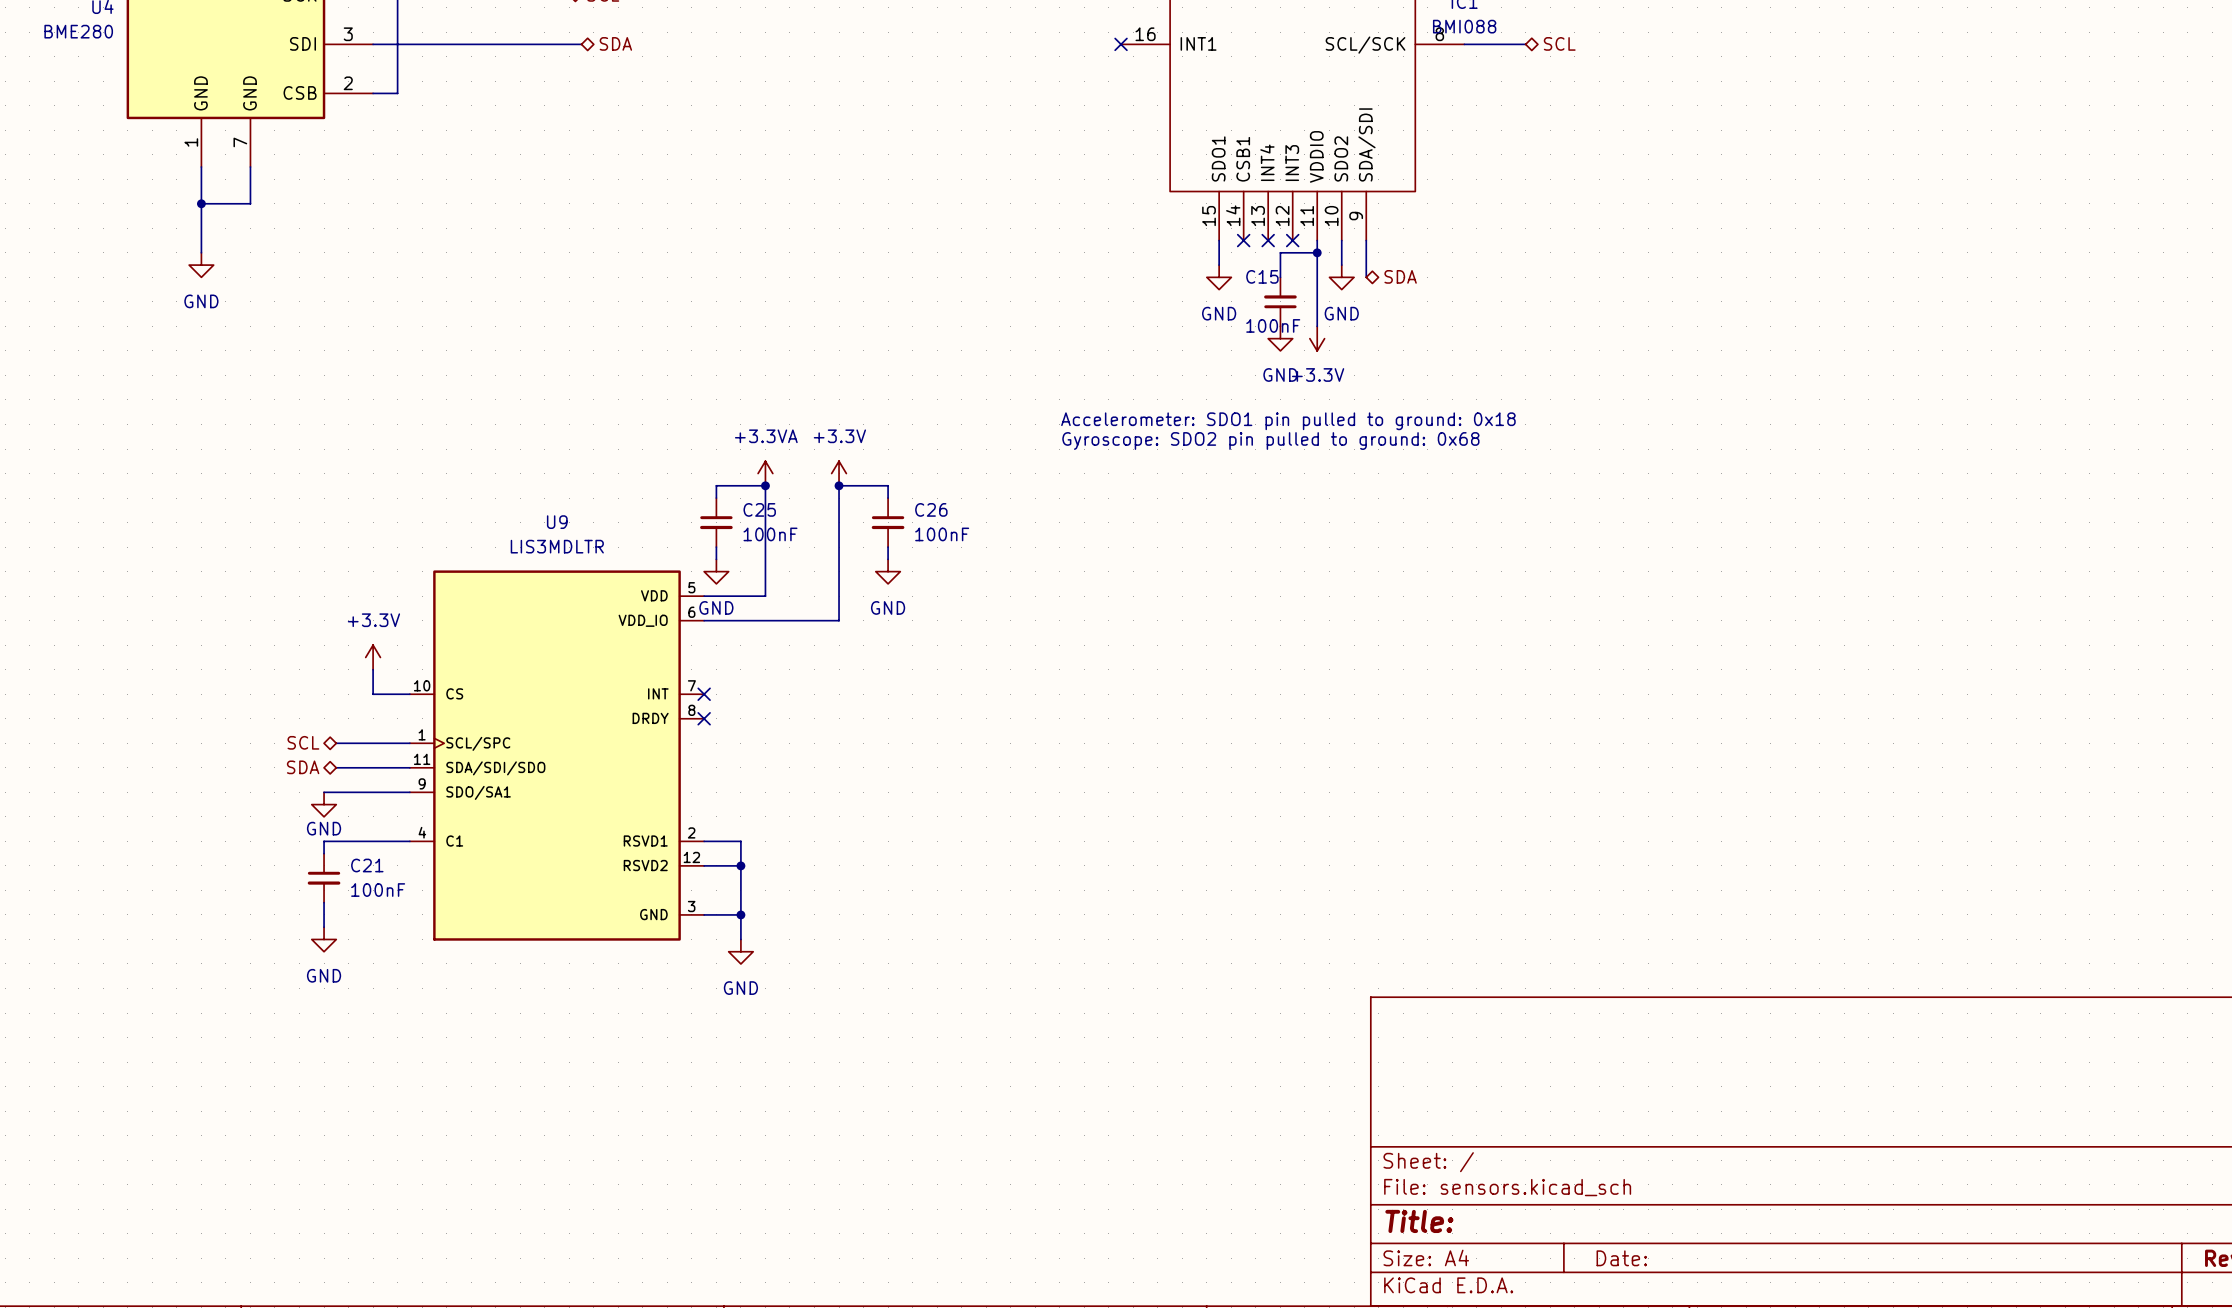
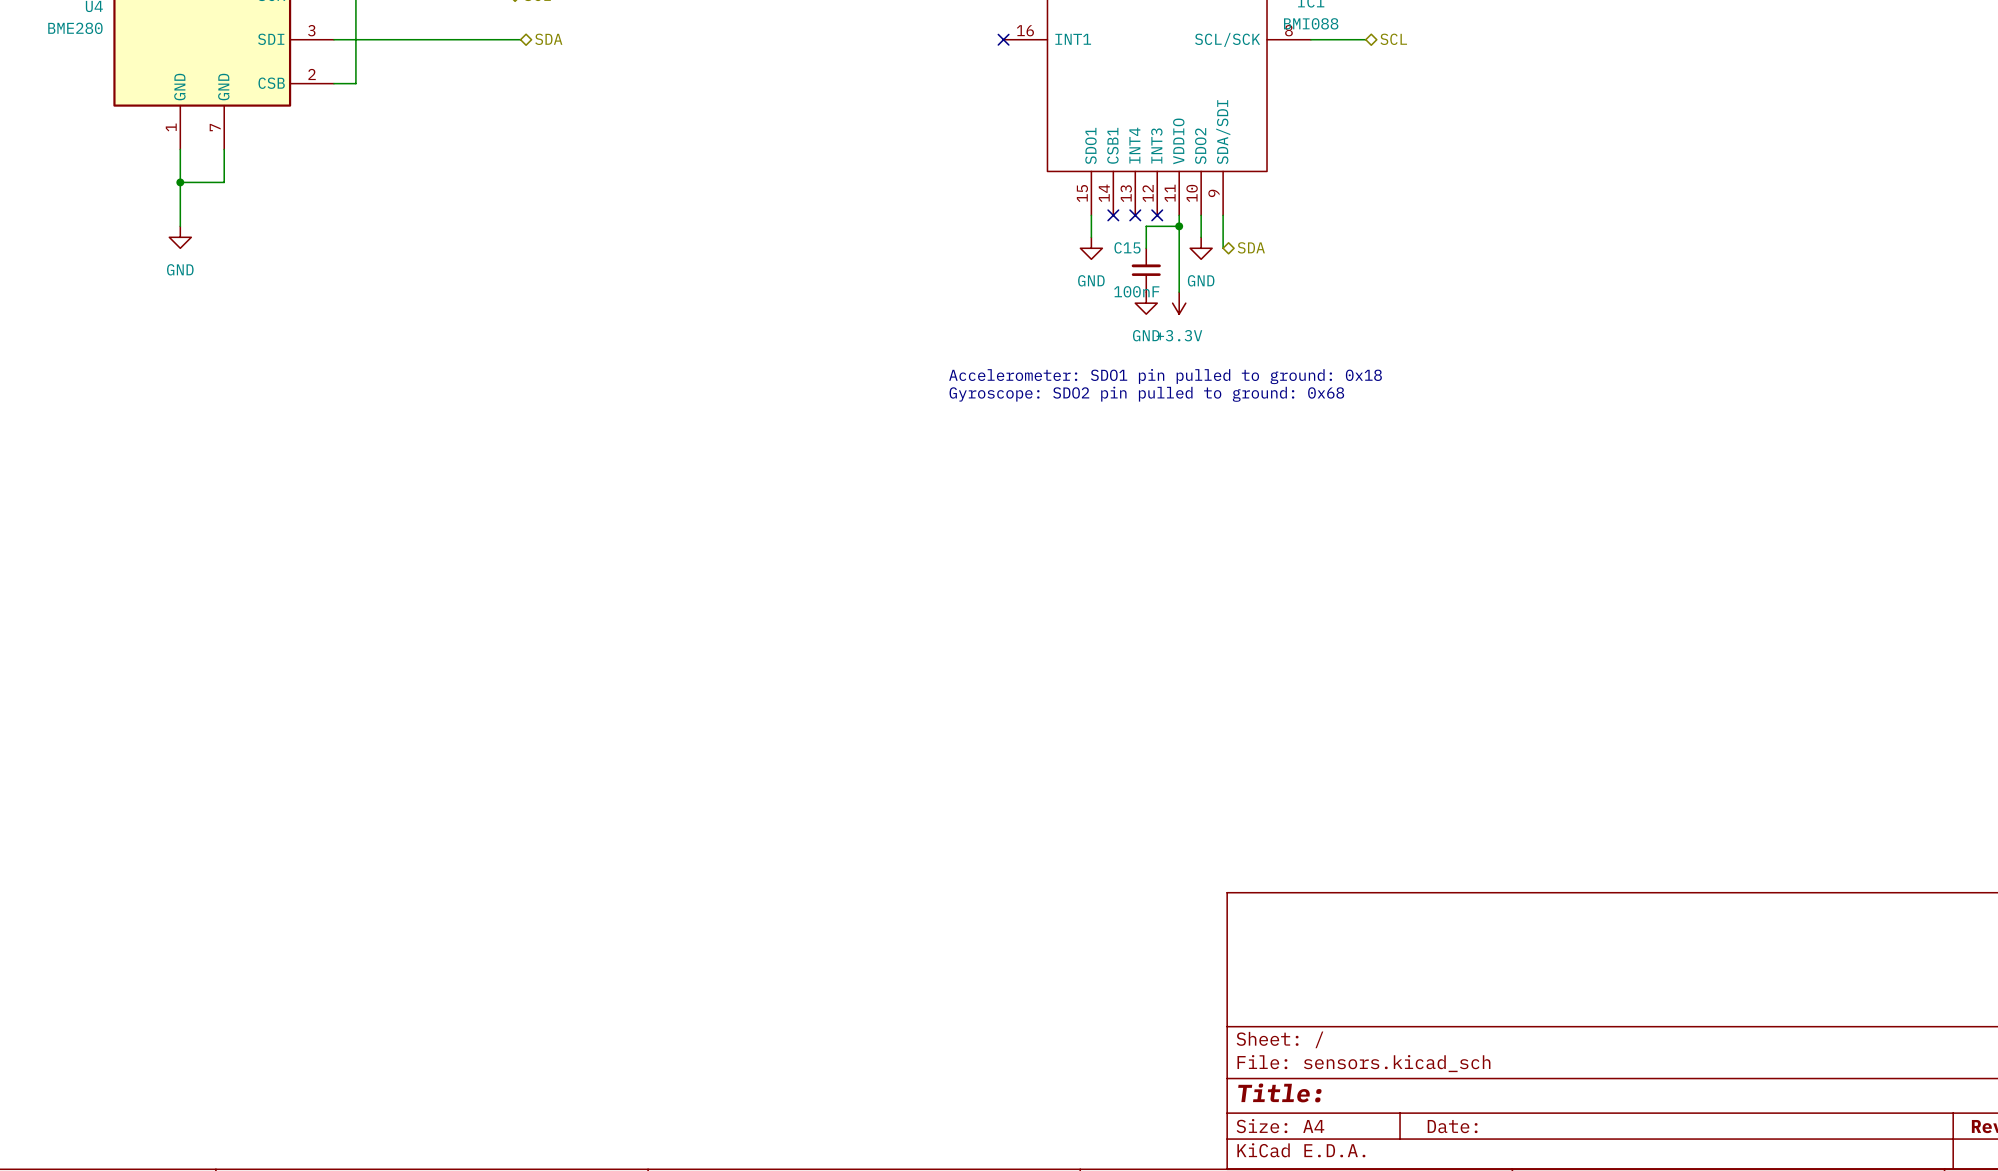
power symbol: +3.3VA (765, 473) -> none
power symbol: +3.3V (839, 473) -> none
junction: (765, 485) -> none
junction: (839, 485) -> none
wire: (716, 498) (716, 485) (765, 485) (765, 596) (704, 596) -> none
wire: (888, 498) (888, 485) (839, 485) (839, 620) (704, 620) -> none
C25: 100nF (716, 522) -> none
C26: 100nF (888, 522) -> none
wire: (716, 547) (716, 559) -> none
wire: (888, 547) (888, 559) -> none
power symbol: GND (716, 571) -> none
power symbol: GND (888, 571) -> none
power symbol: +3.3V (373, 657) -> none
wire: (373, 669) (373, 694) (409, 694) -> none
no-connect mark: (704, 694) -> none
no-connect mark: (704, 718) -> none
hierarchical label: SCL (303, 742) -> none
wire: (336, 743) (409, 743) -> none
U9: LIS3MDLTR (557, 755) -> none
hierarchical label: SDA (303, 767) -> none
wire: (336, 767) (409, 767) -> none
wire: (324, 792) (409, 792) -> none
power symbol: GND (324, 804) -> none
wire: (409, 841) (324, 841) (324, 853) -> none
wire: (704, 841) (740, 841) (740, 939) -> none
wire: (704, 865) (740, 865) -> none
junction: (740, 865) -> none
C21: 100nF (324, 878) -> none
wire: (324, 902) (324, 927) -> none
wire: (704, 914) (740, 914) -> none
junction: (740, 914) -> none
power symbol: GND (324, 939) -> none
power symbol: GND (740, 951) -> none

